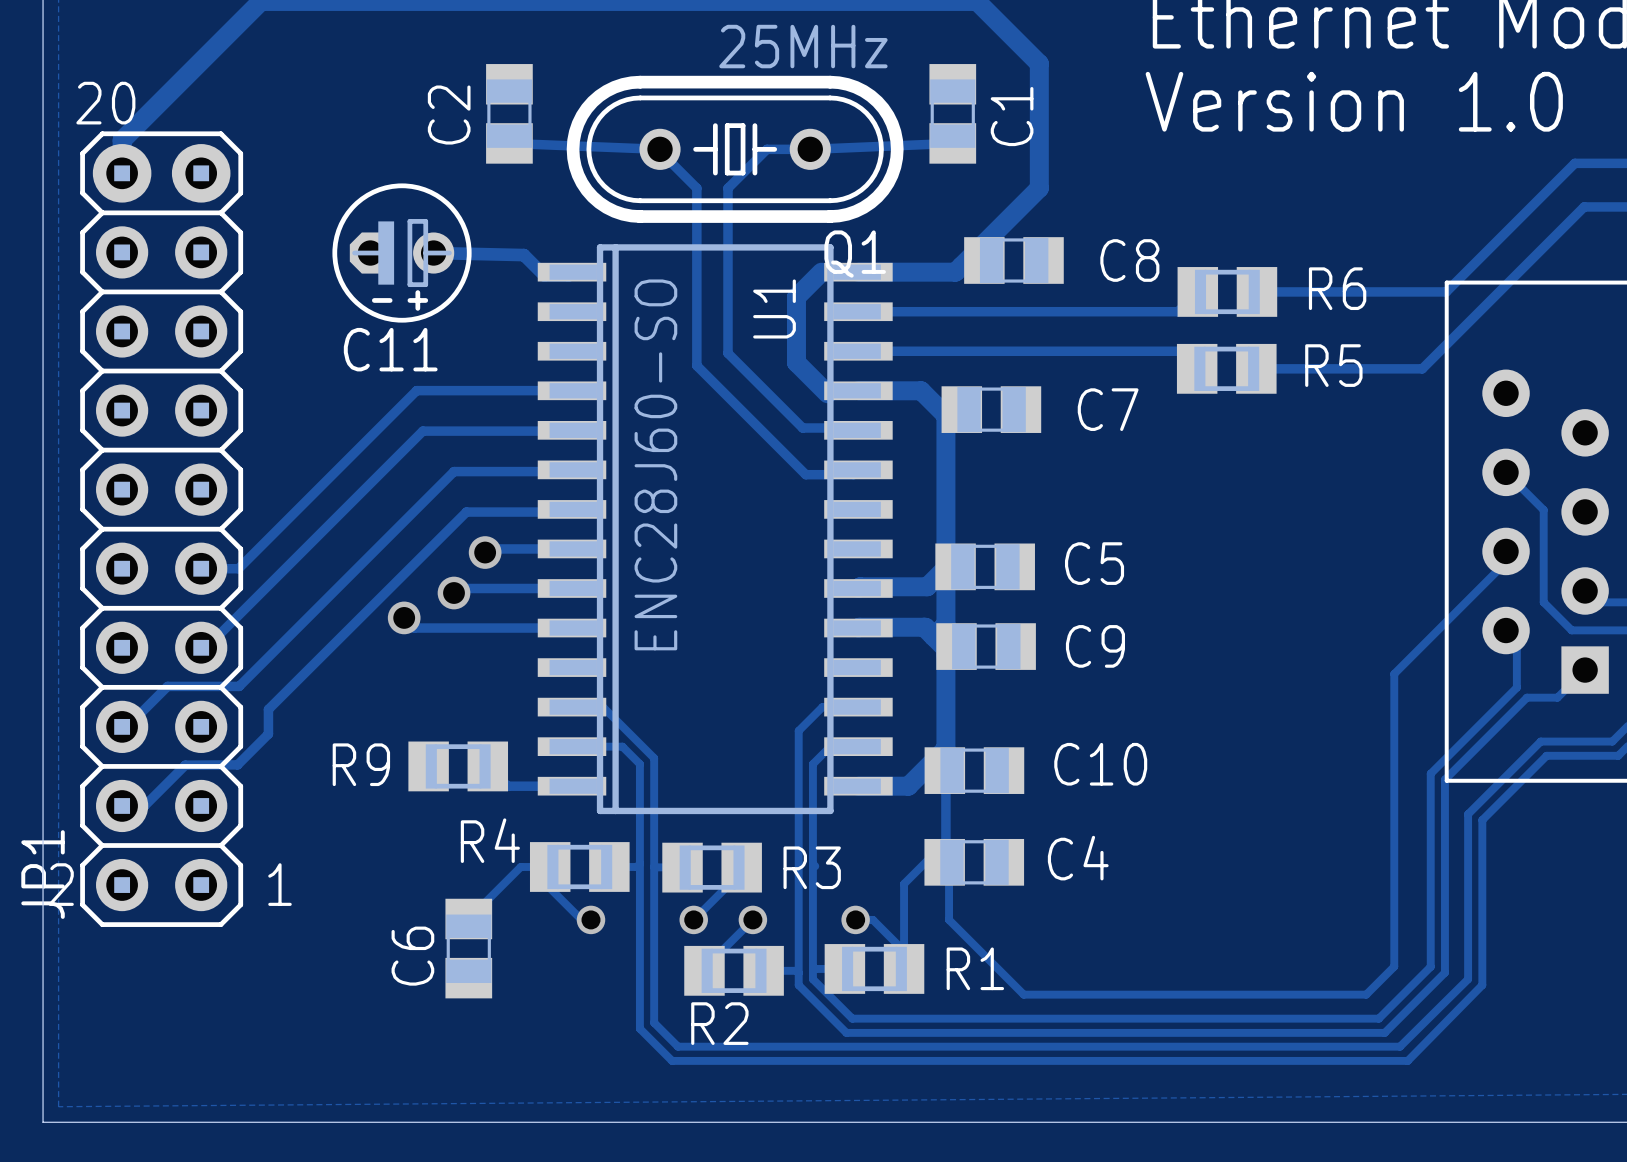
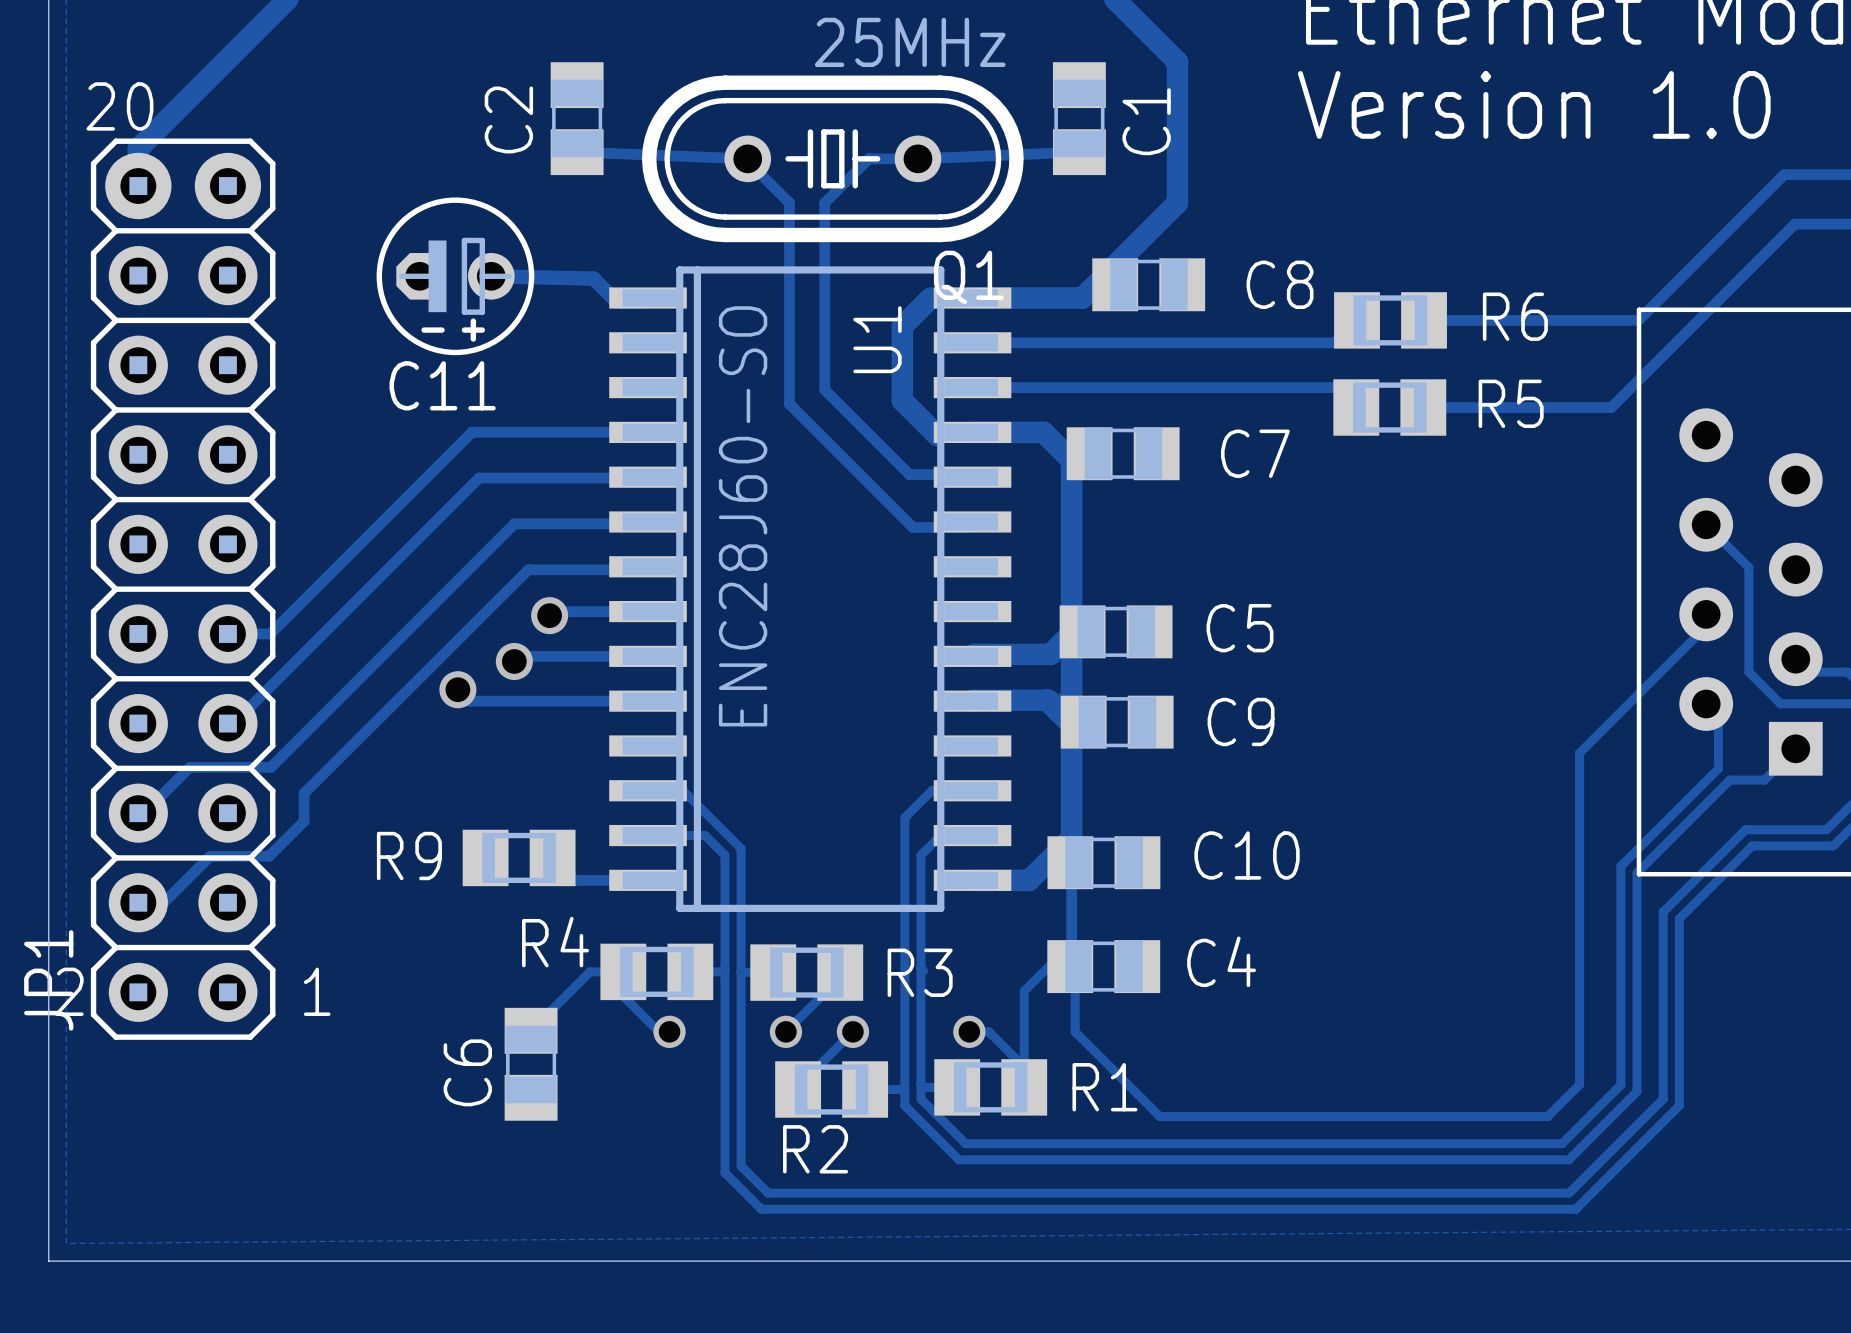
track: (1468, 979) (1400, 1046) (678, 1046) (654, 1022) -> (1663, 1099) (1569, 1193) (768, 1193) (741, 1166) (741, 1148)
track: (1482, 985) (1407, 1060) (672, 1060) (639, 1028) -> (1679, 1105) (1575, 1209) (761, 1209) (724, 1172) (724, 1155)

